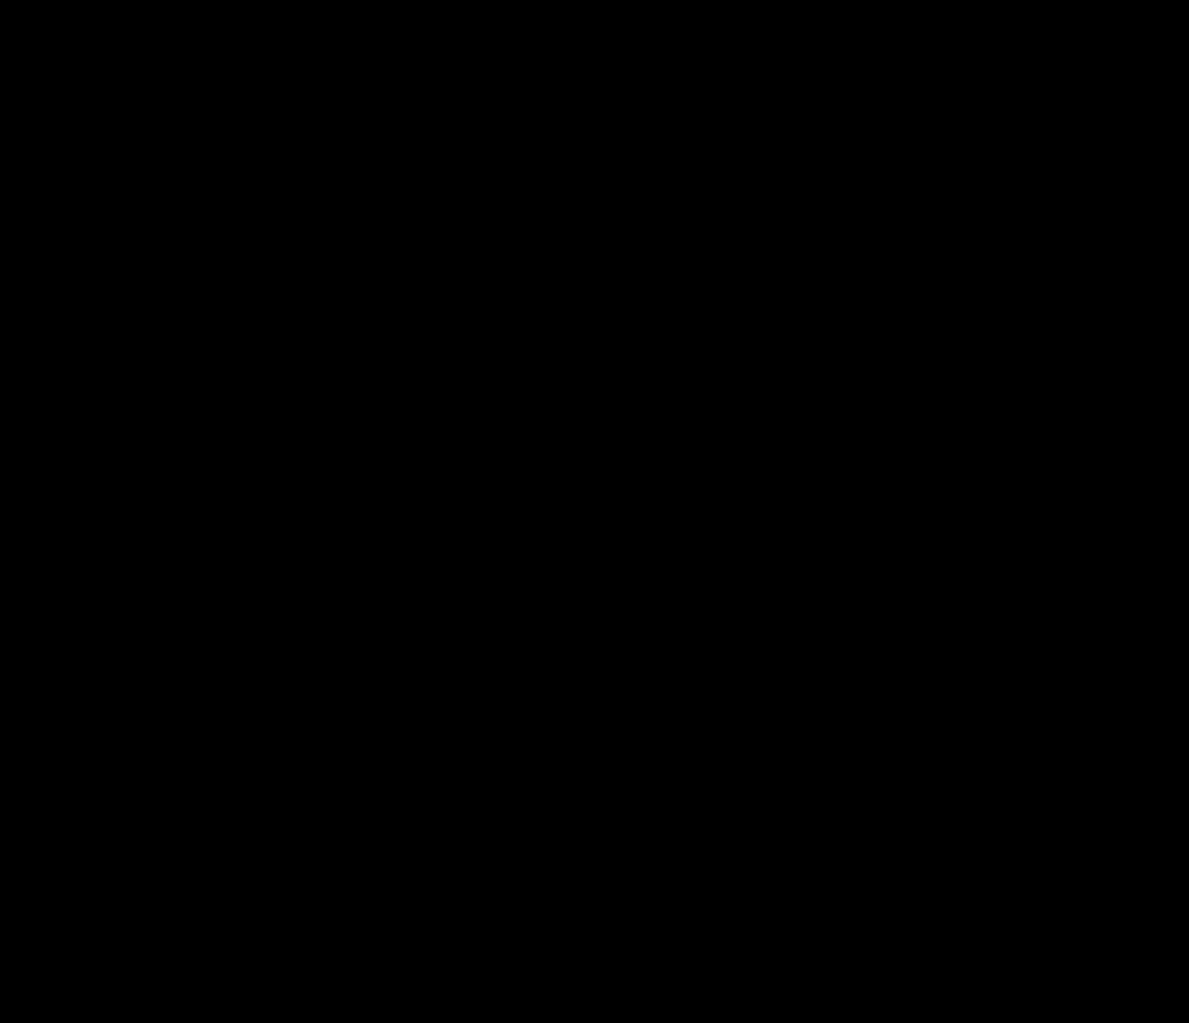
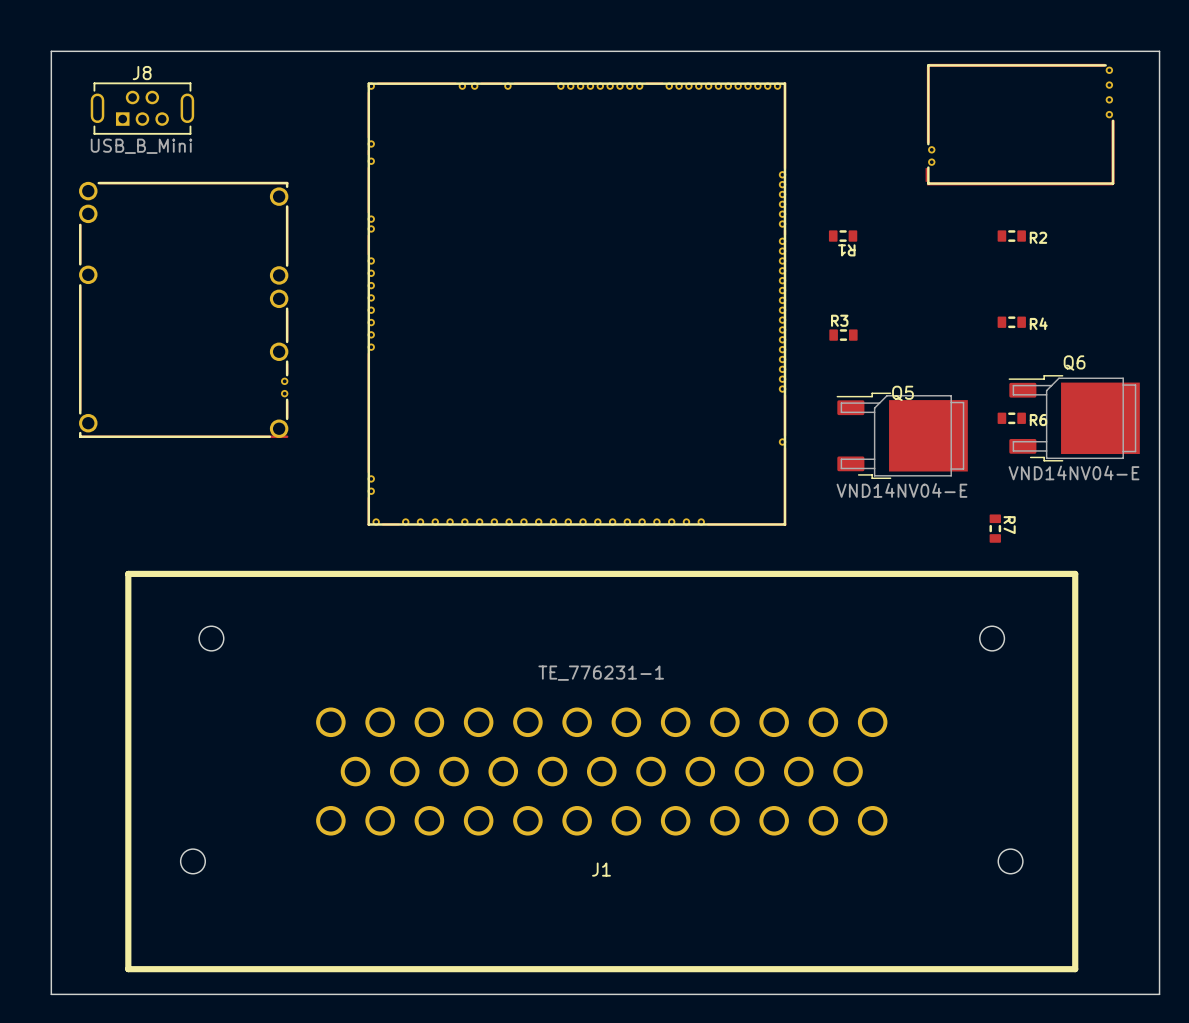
board edge: none -> (51, 51) (1159, 51) (1159, 994) (51, 994) (51, 51)
J8: none -> USB_B_Mini (142, 108)
part: none -> (1020, 124)
R1: none -> (843, 236)
R2: none -> (1011, 236)
part: none -> (576, 304)
part: none -> (183, 309)
R4: none -> (1011, 322)
R3: none -> (843, 335)
R6: none -> (1011, 418)
Q6: none -> VND14NV04-E (1074, 418)
Q5: none -> VND14NV04-E (902, 435)
R7: none -> (995, 528)
J1: none -> TE_776231-1 (601, 771)

